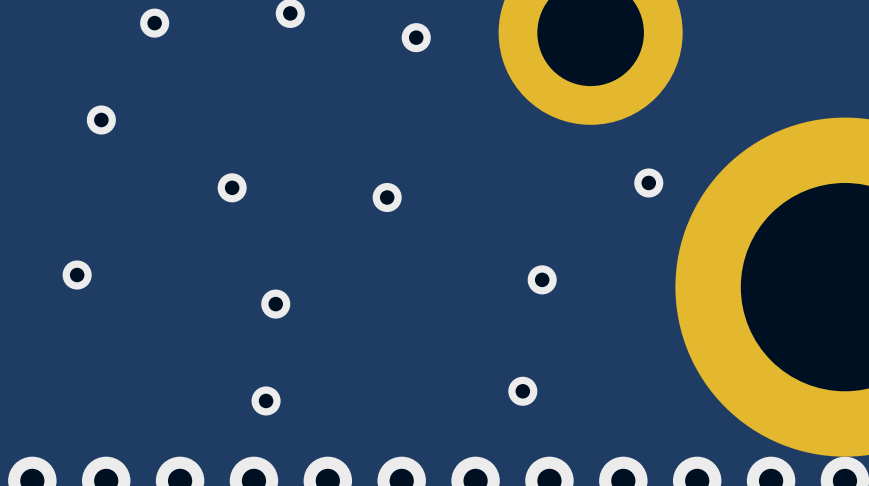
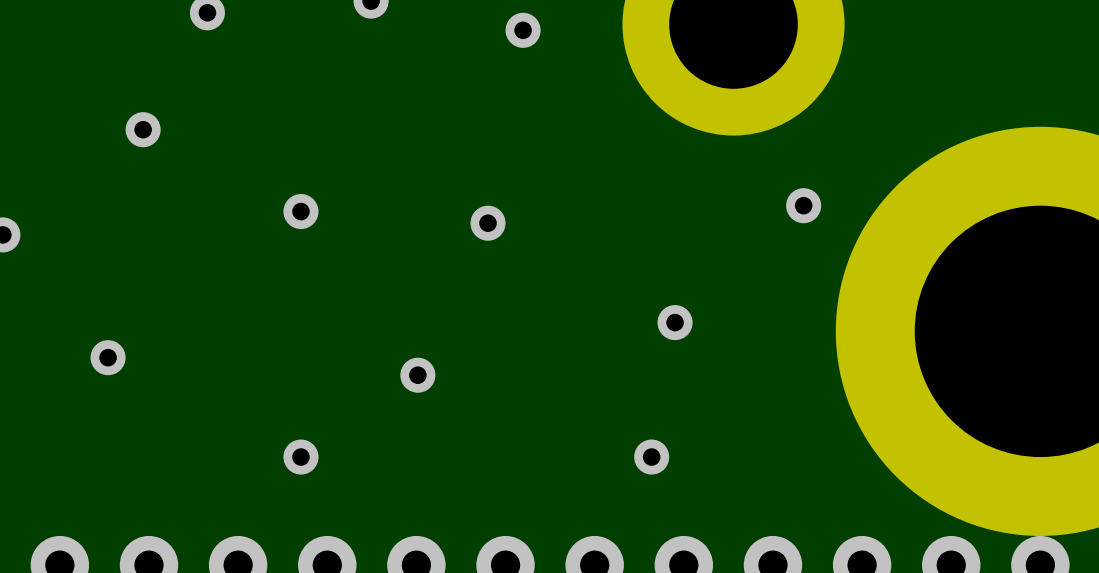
via position: (77, 275) -> (108, 357)
via: (275, 304) -> none
via: none -> (417, 375)
via position: (266, 400) -> (300, 457)

